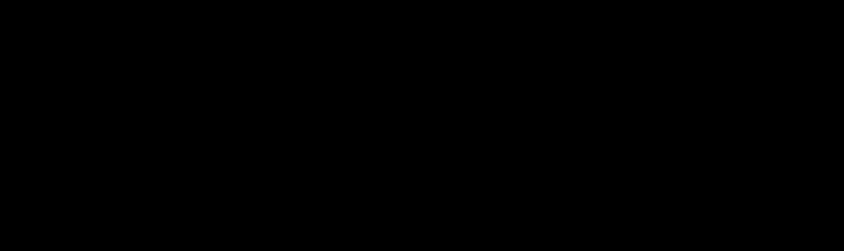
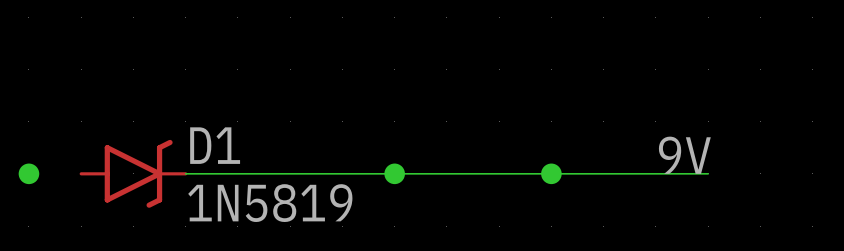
label: none -> 9V (684, 155)
junction: none -> (28, 173)
D1: none -> 1N5819 (133, 173)
wire: none -> (185, 173) (708, 173)
junction: none -> (394, 173)
junction: none -> (551, 173)

